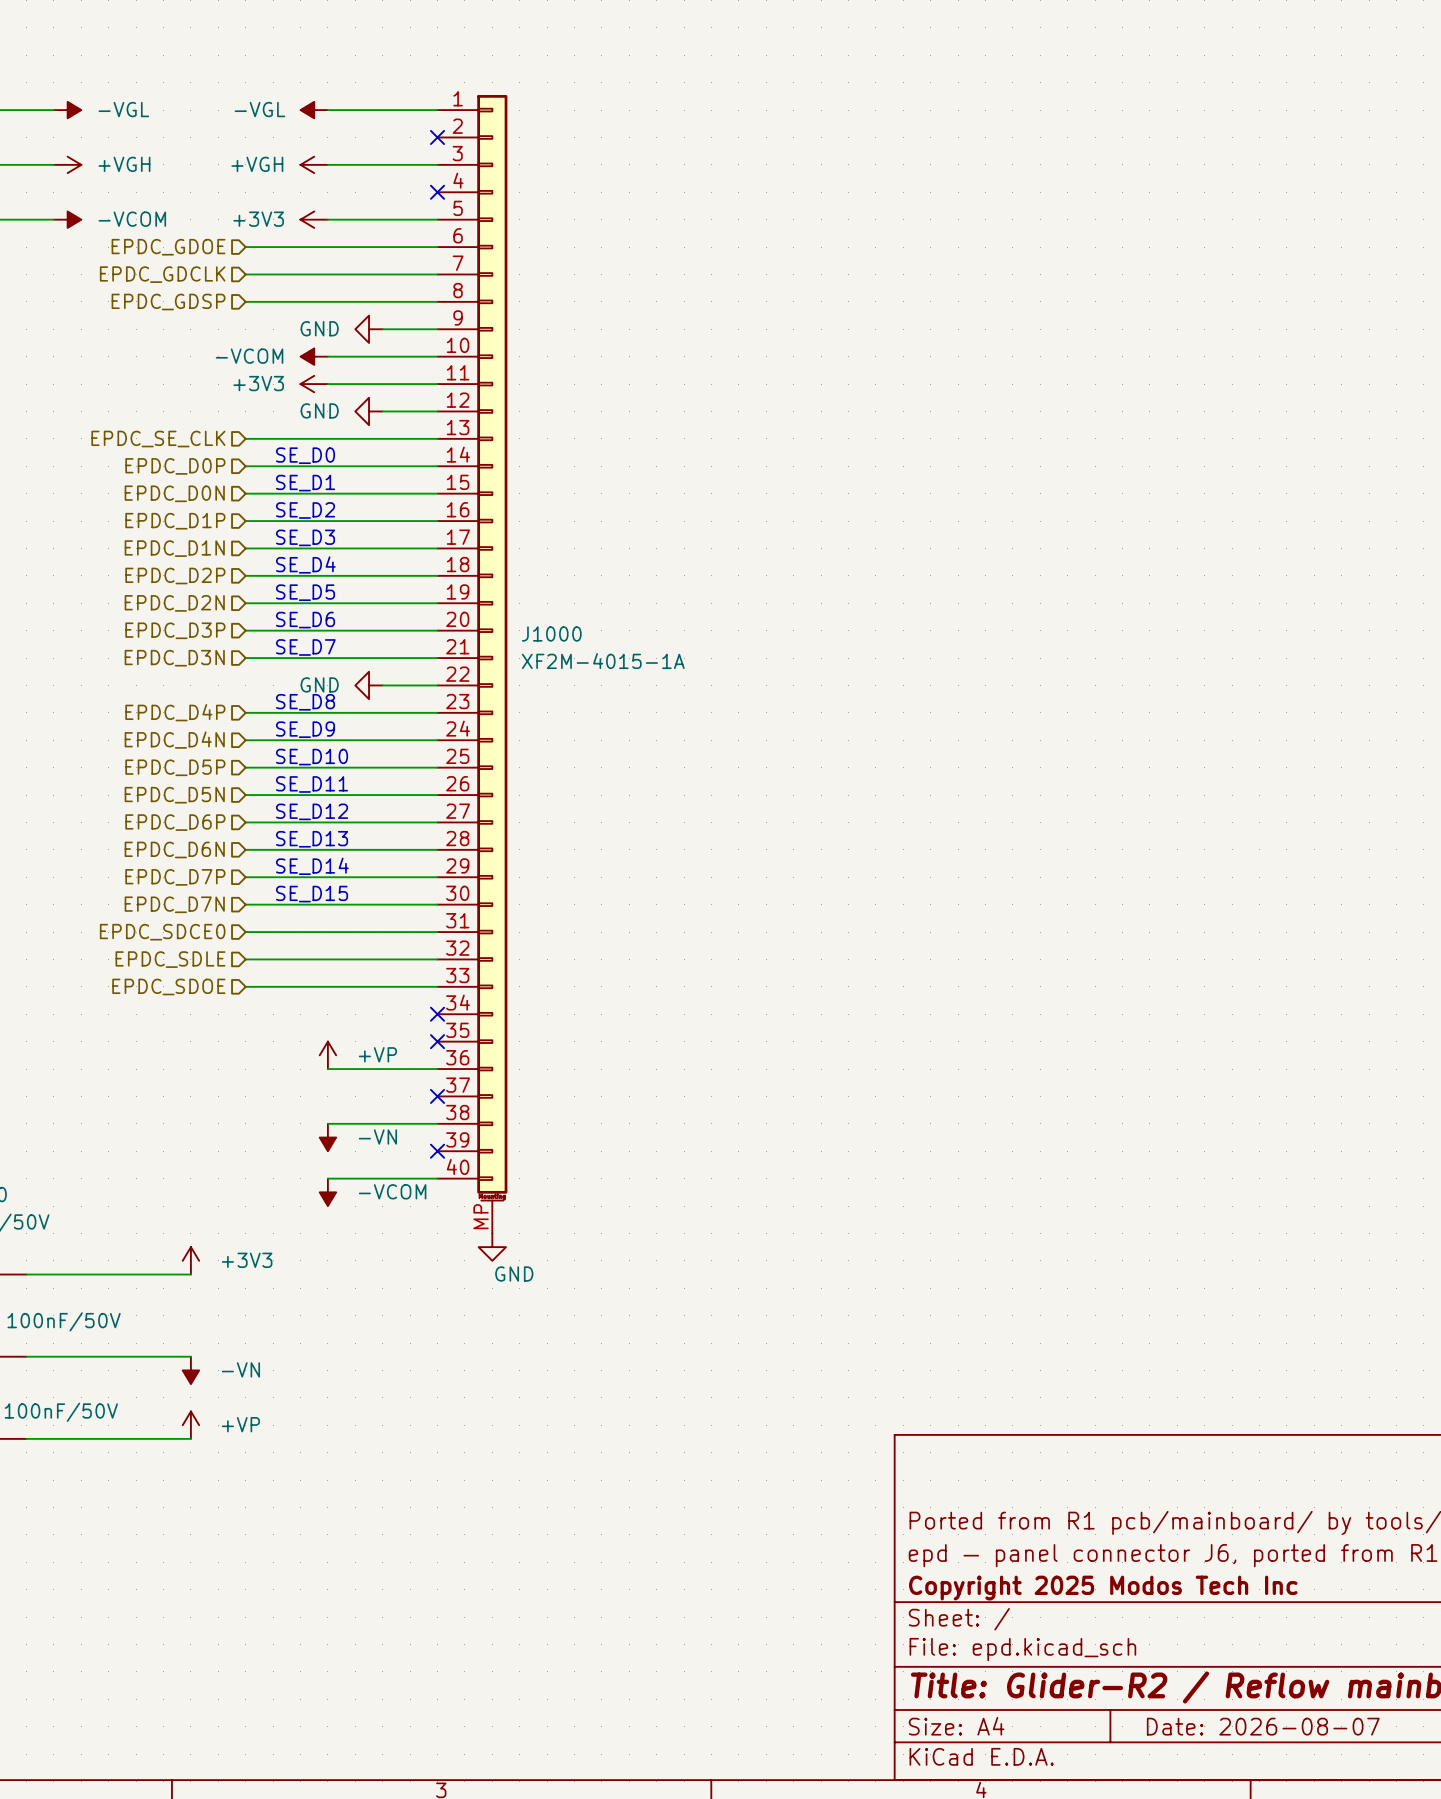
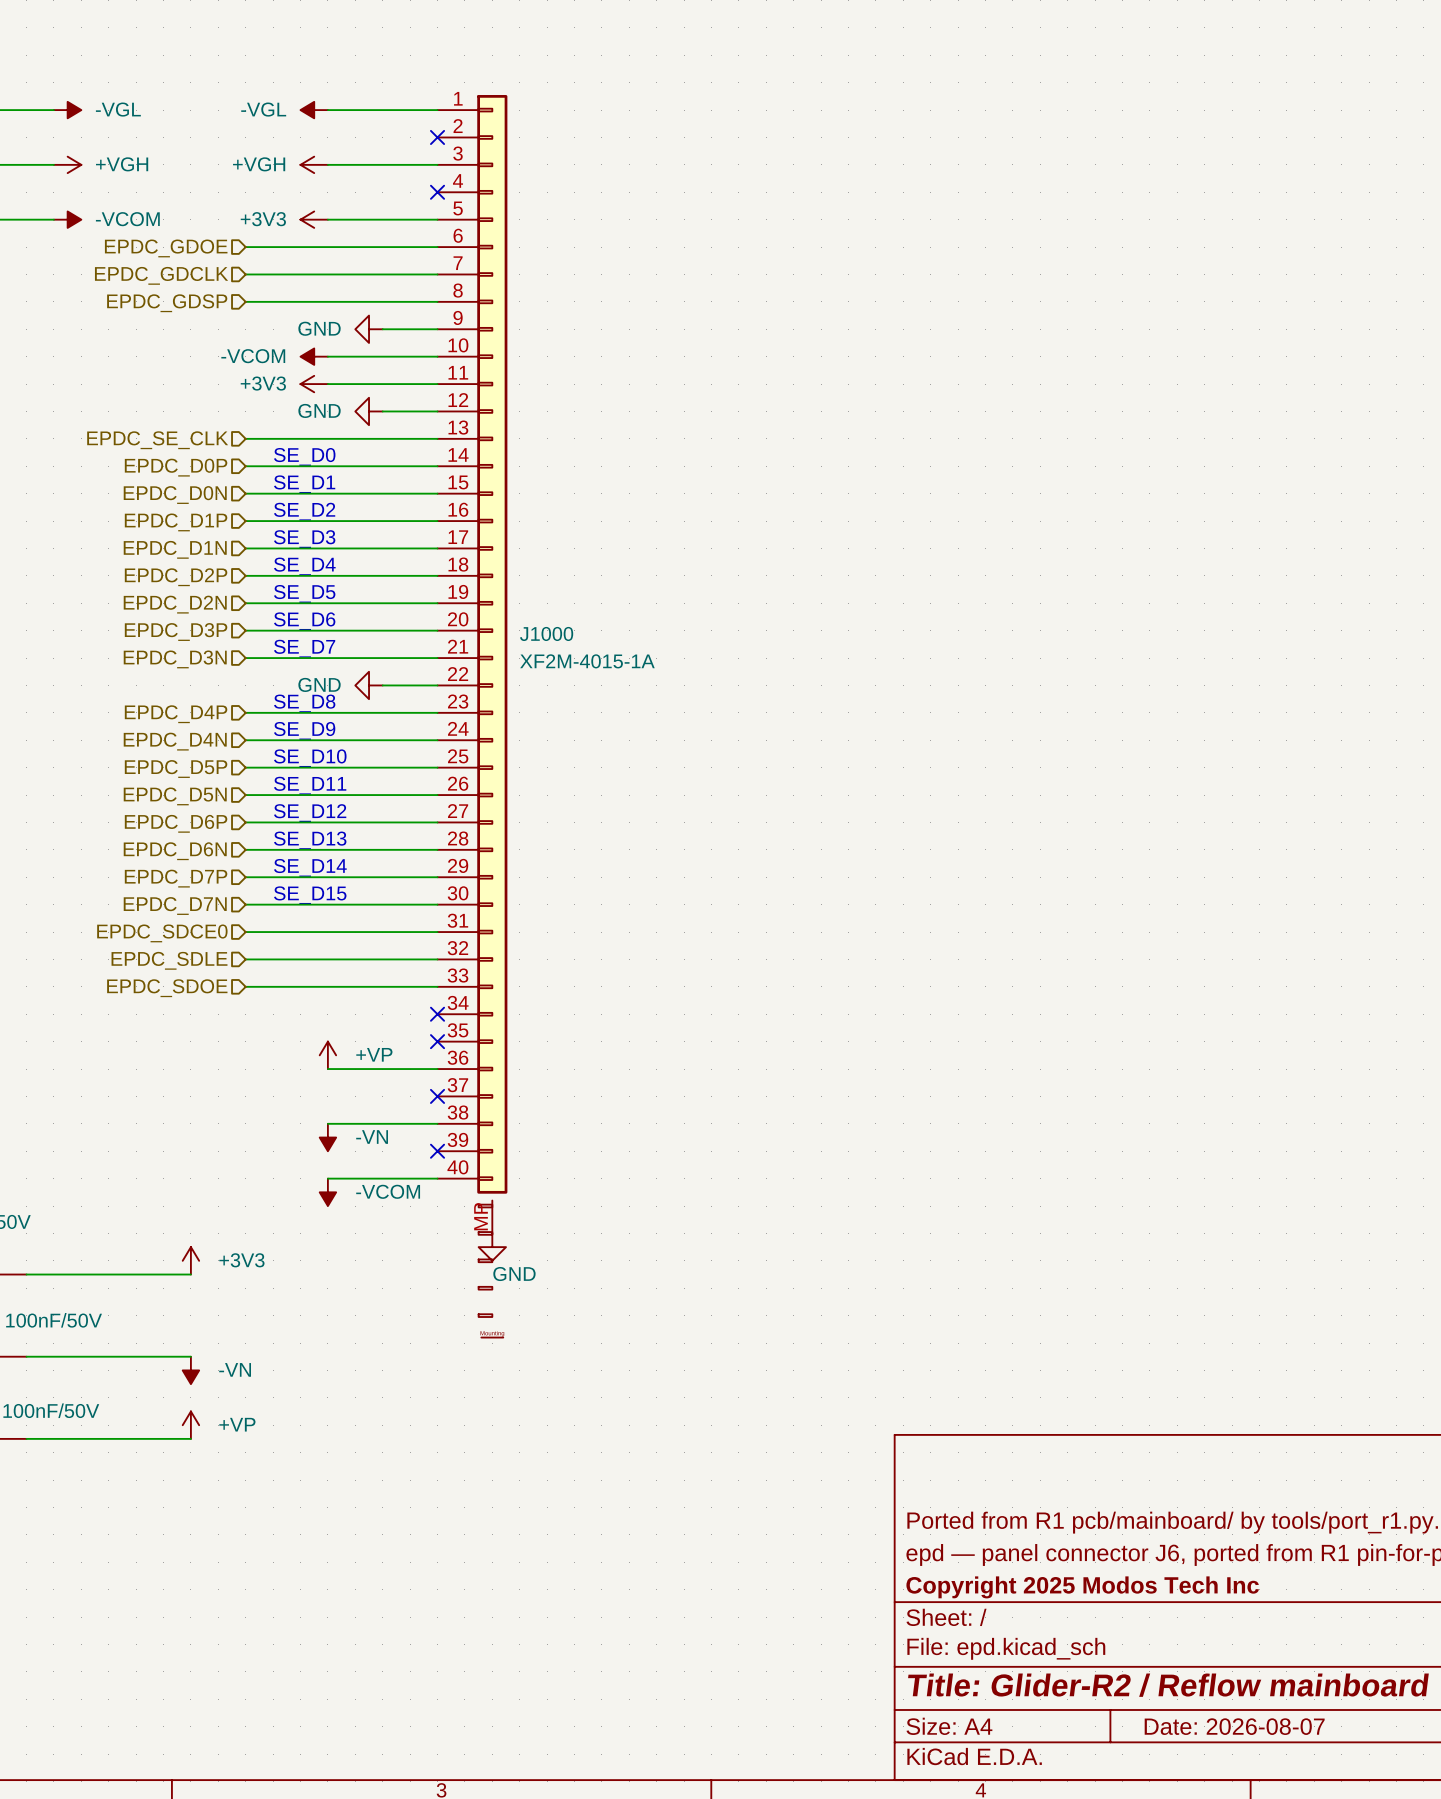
J1000 symbol: [437, 95, 508, 1234] -> [437, 95, 508, 1339]

